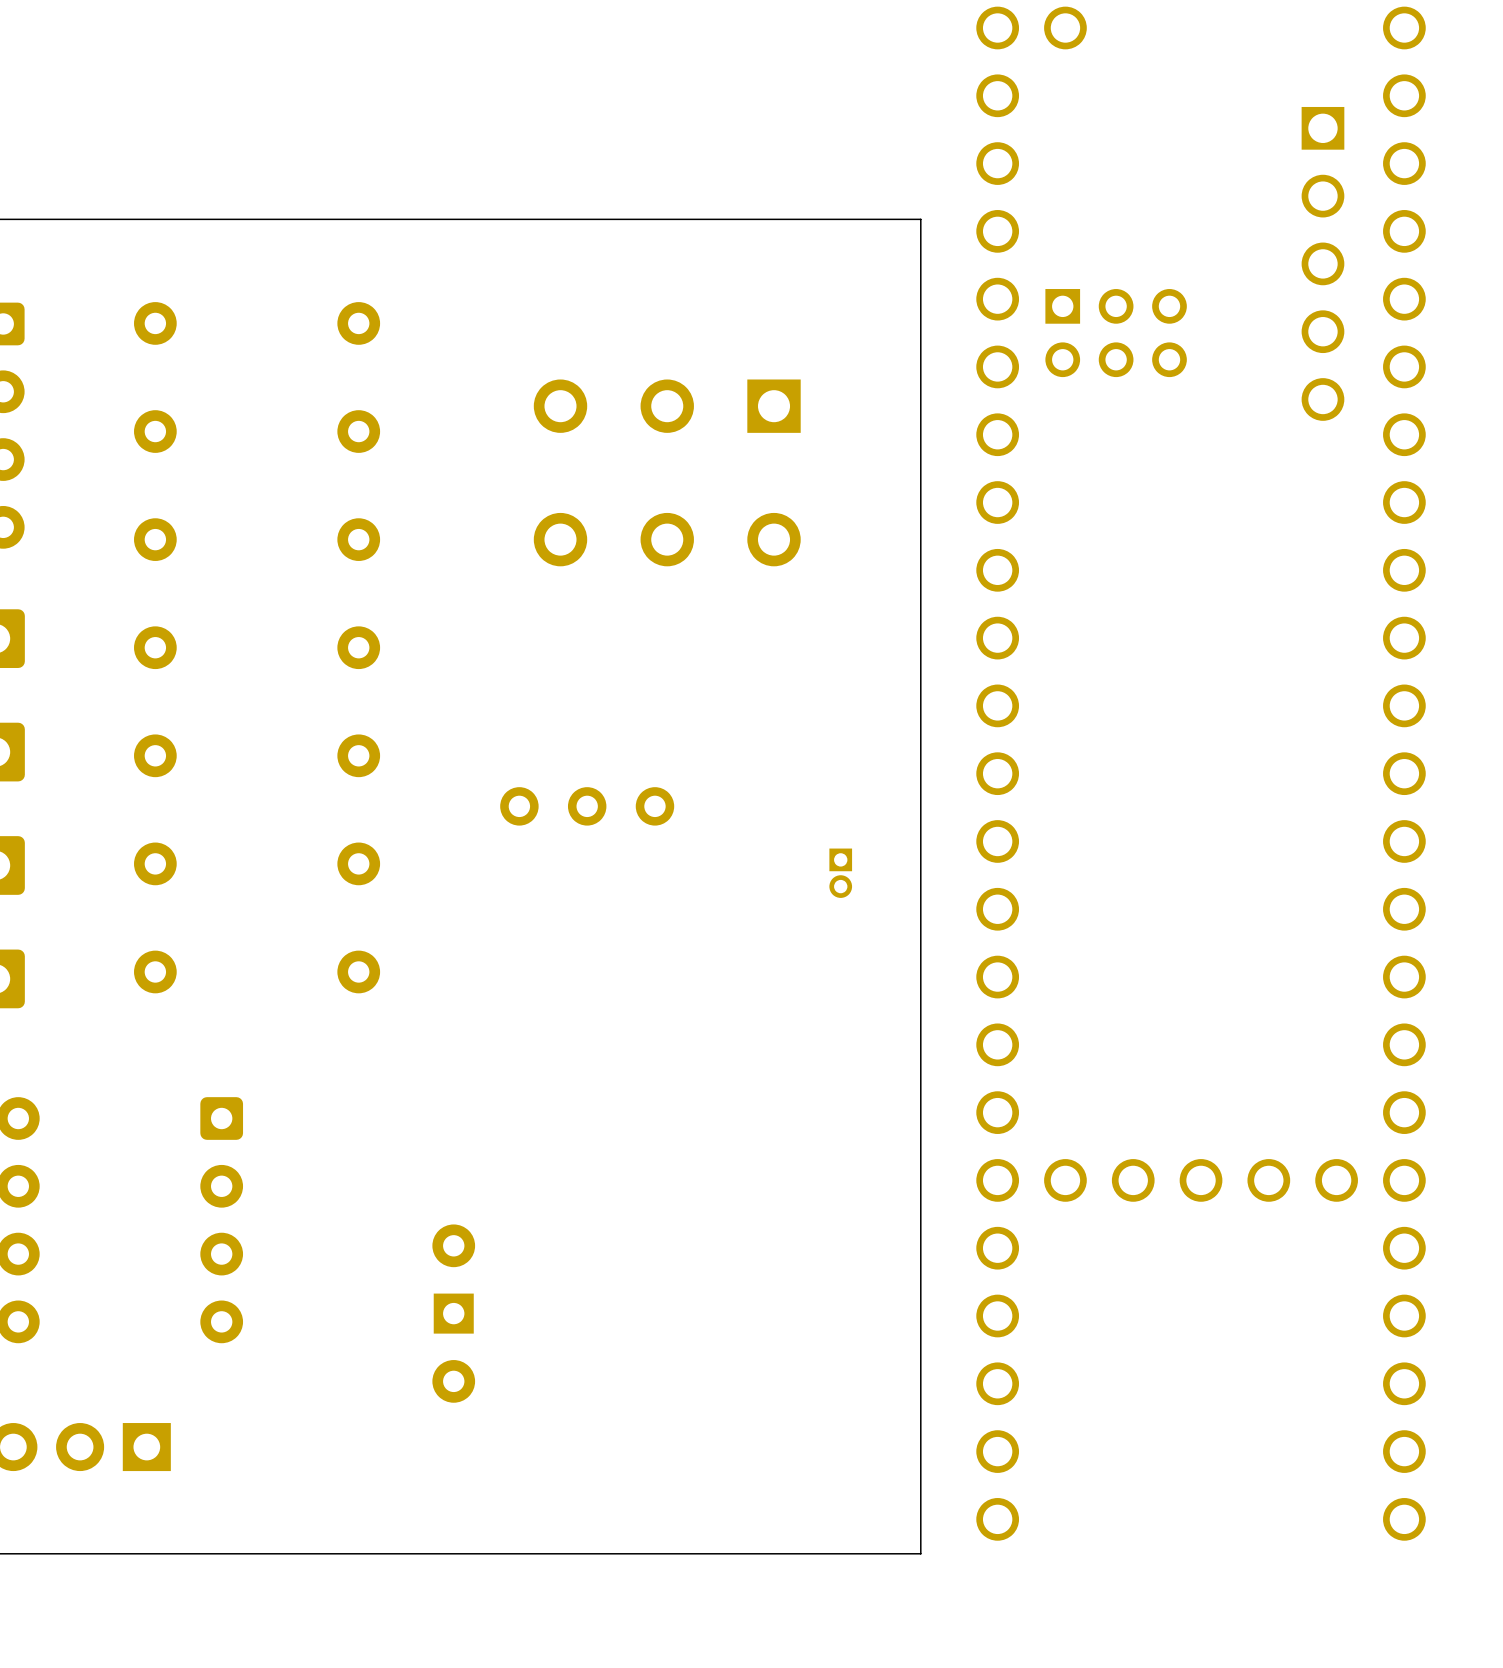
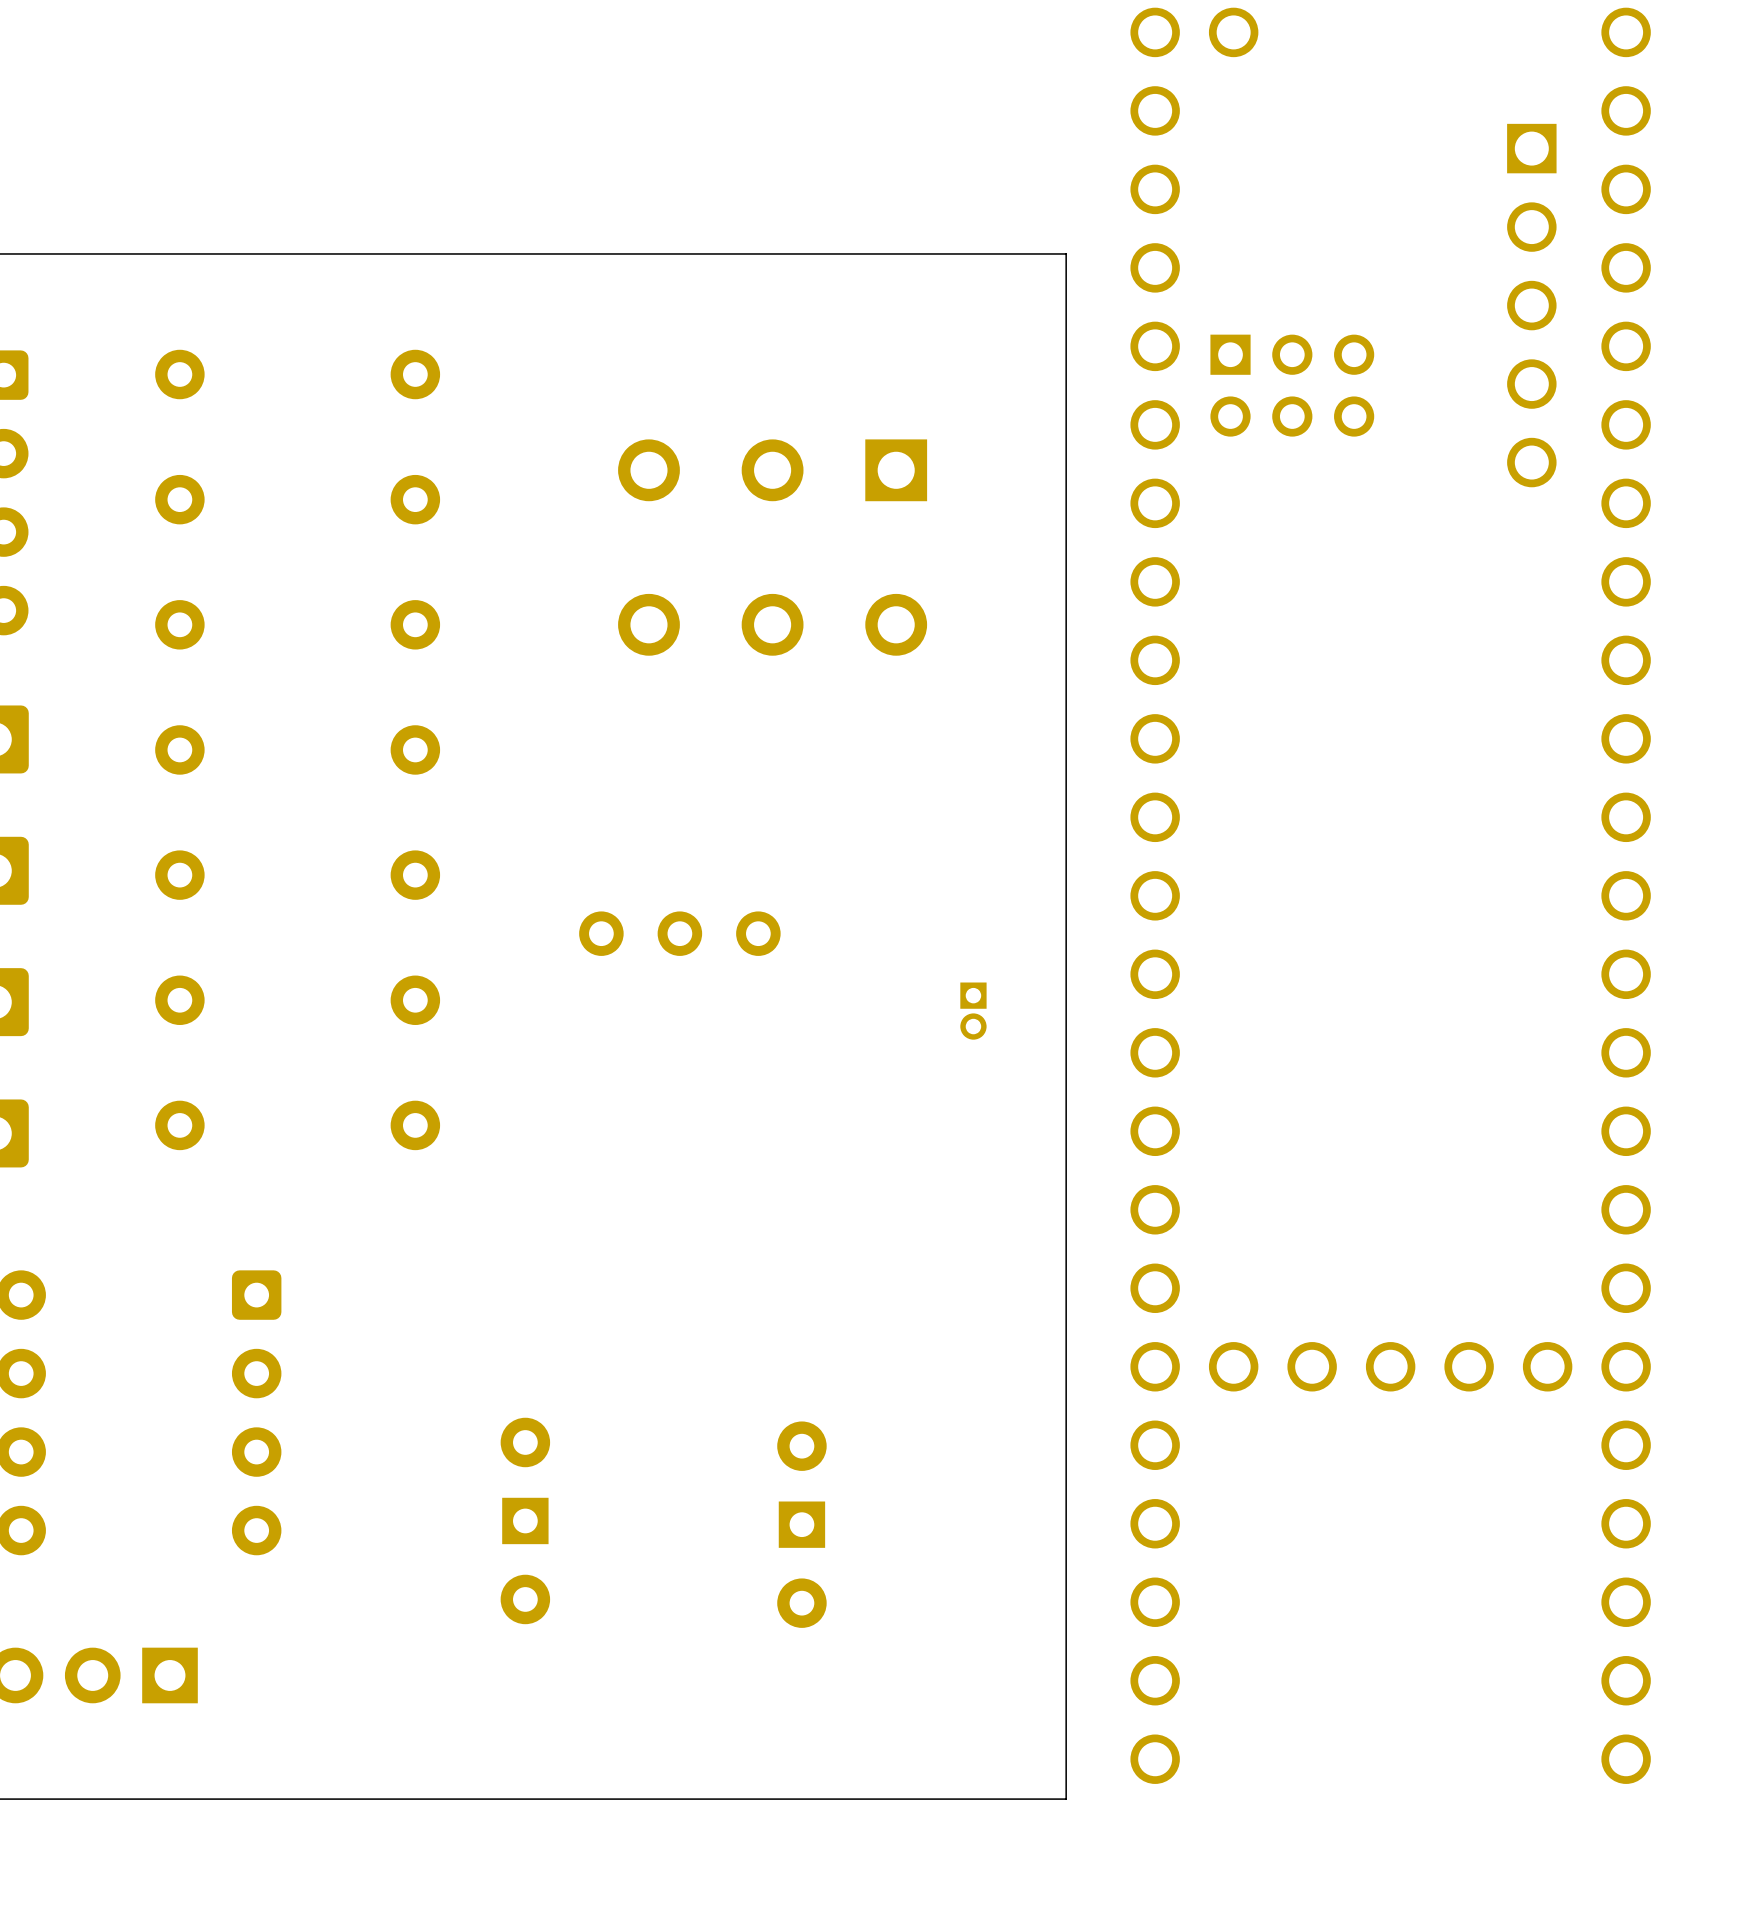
part: none -> (801, 1524)

